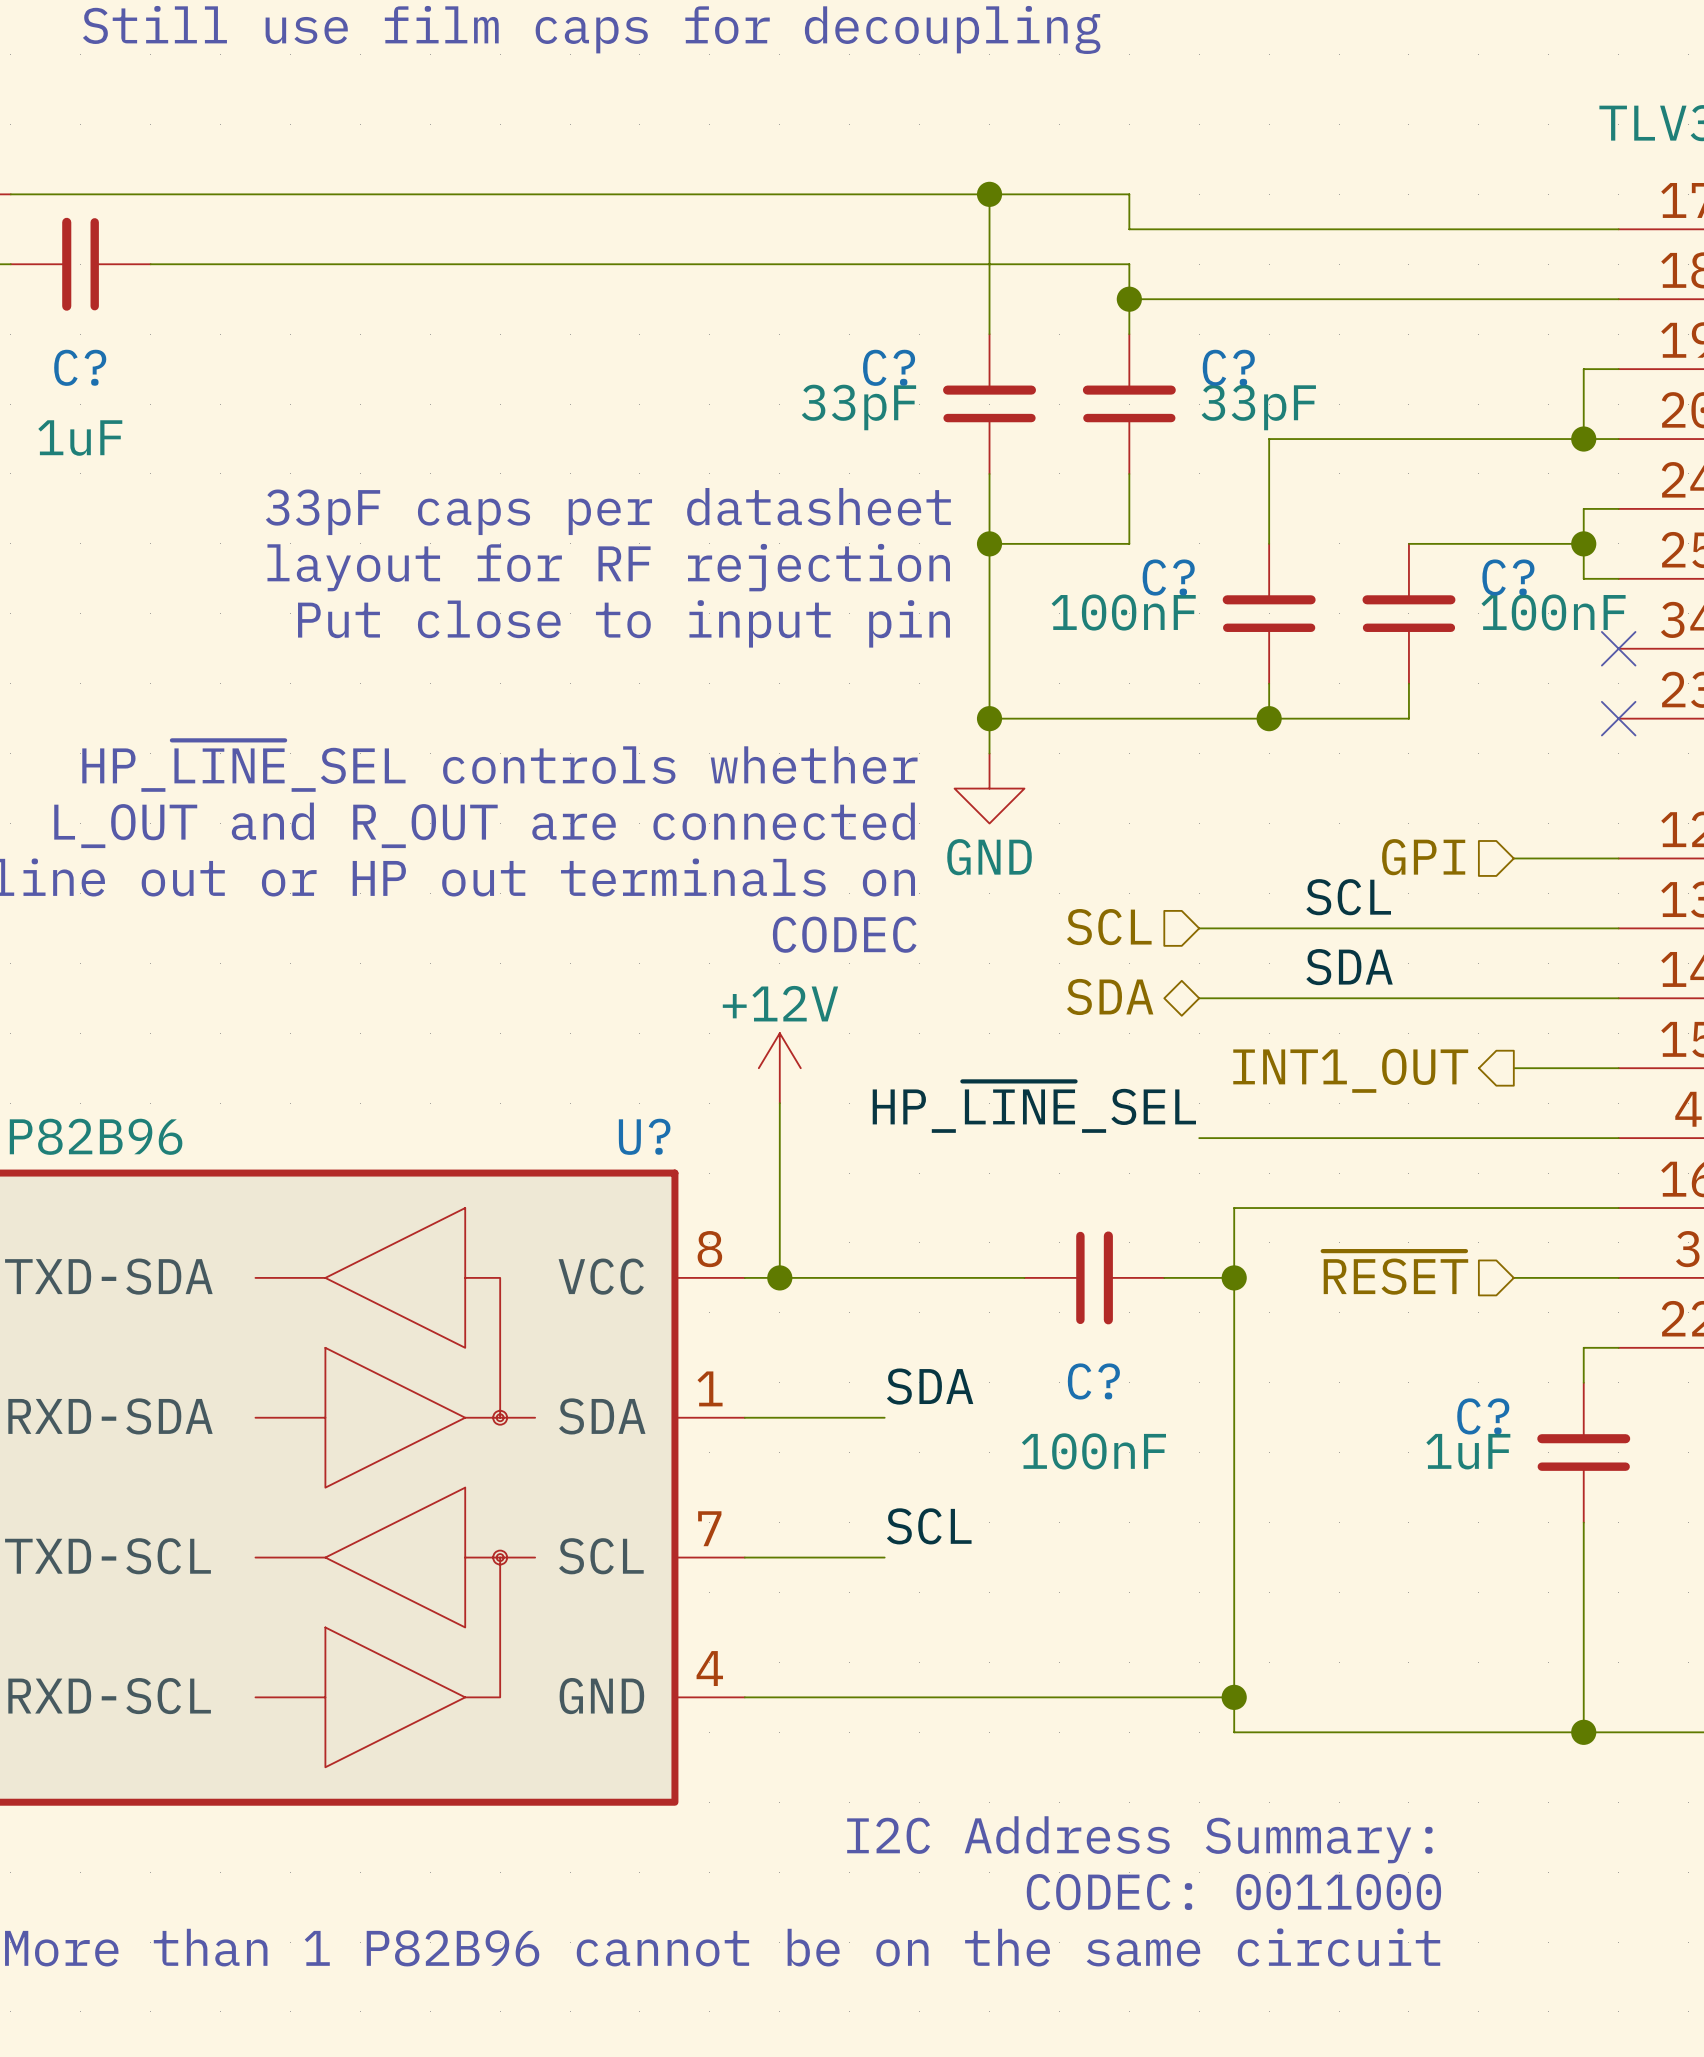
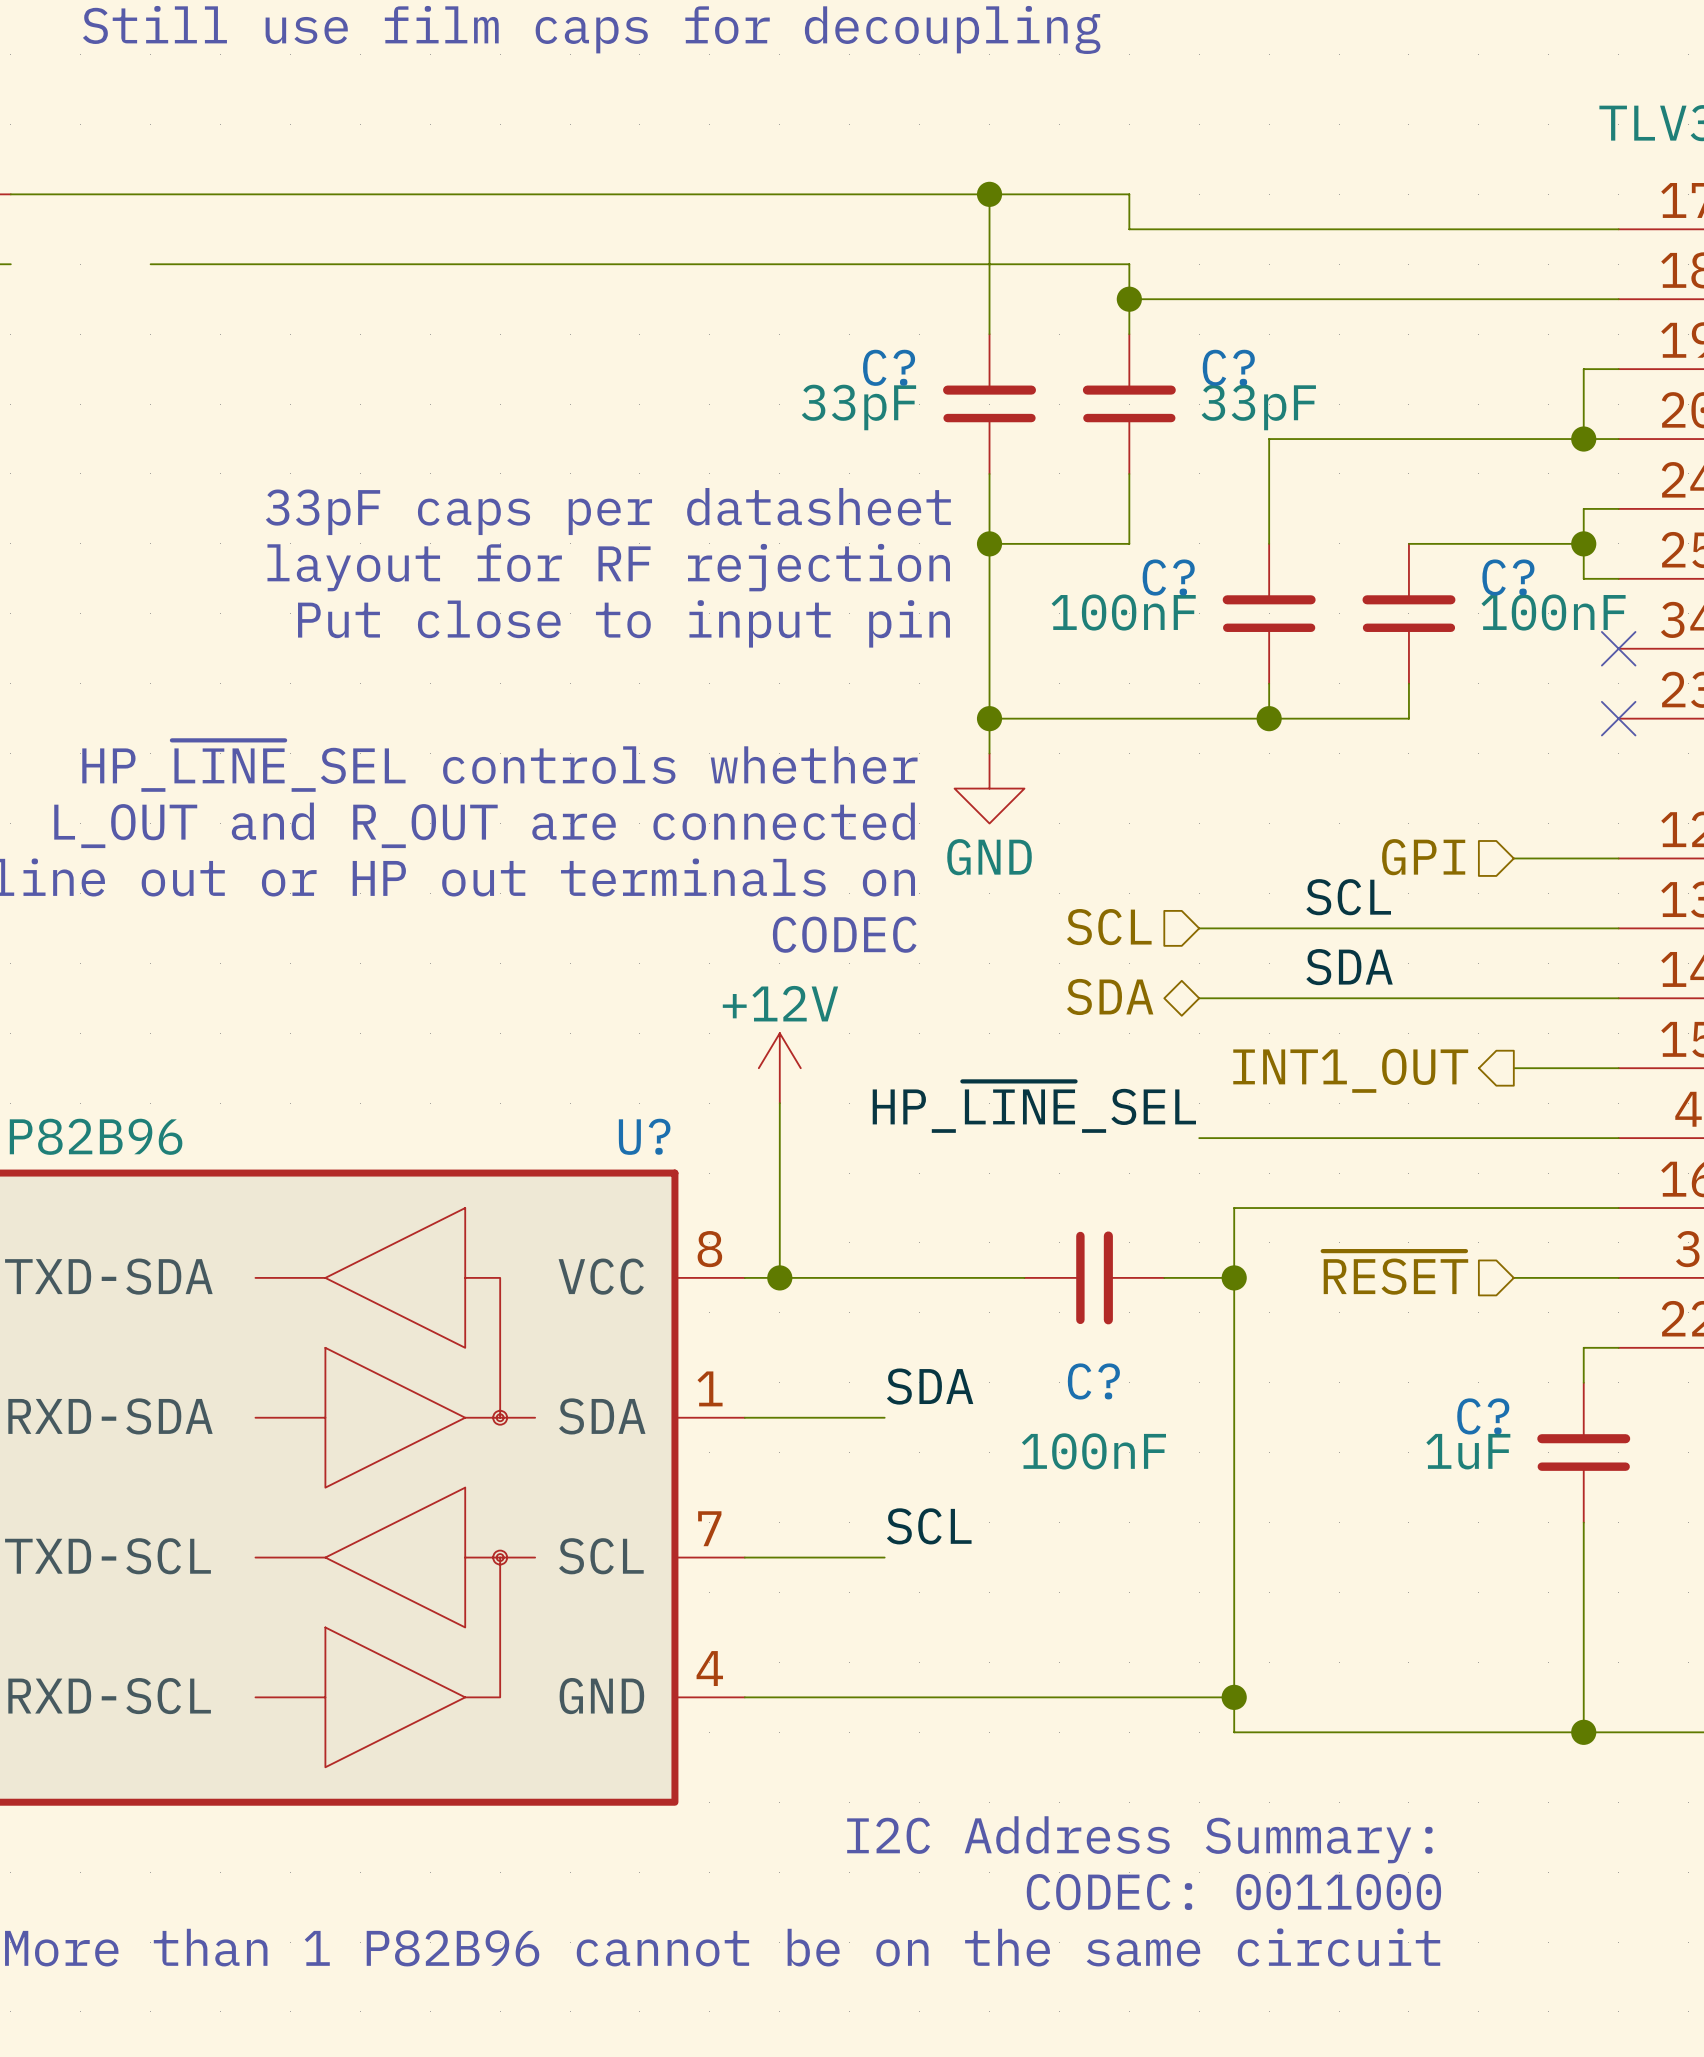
C?: 1uF (80, 264) -> none

